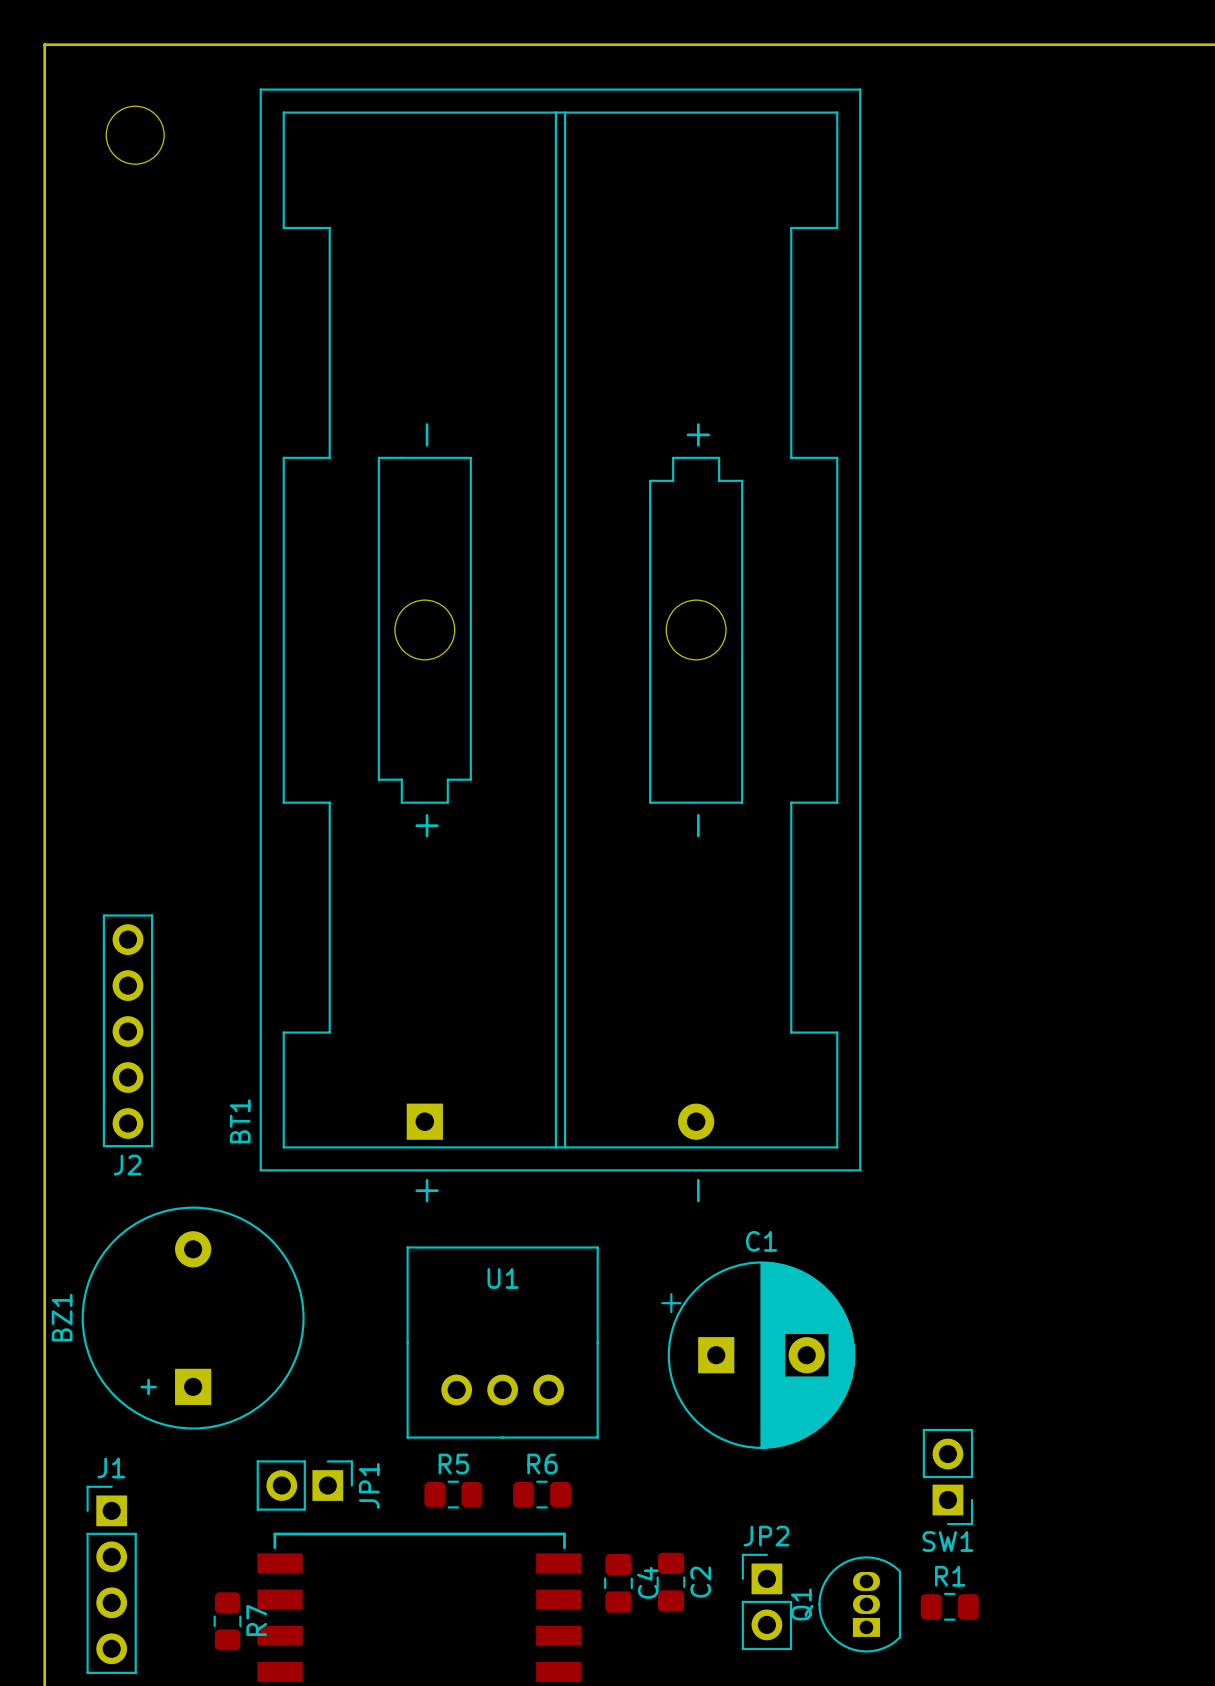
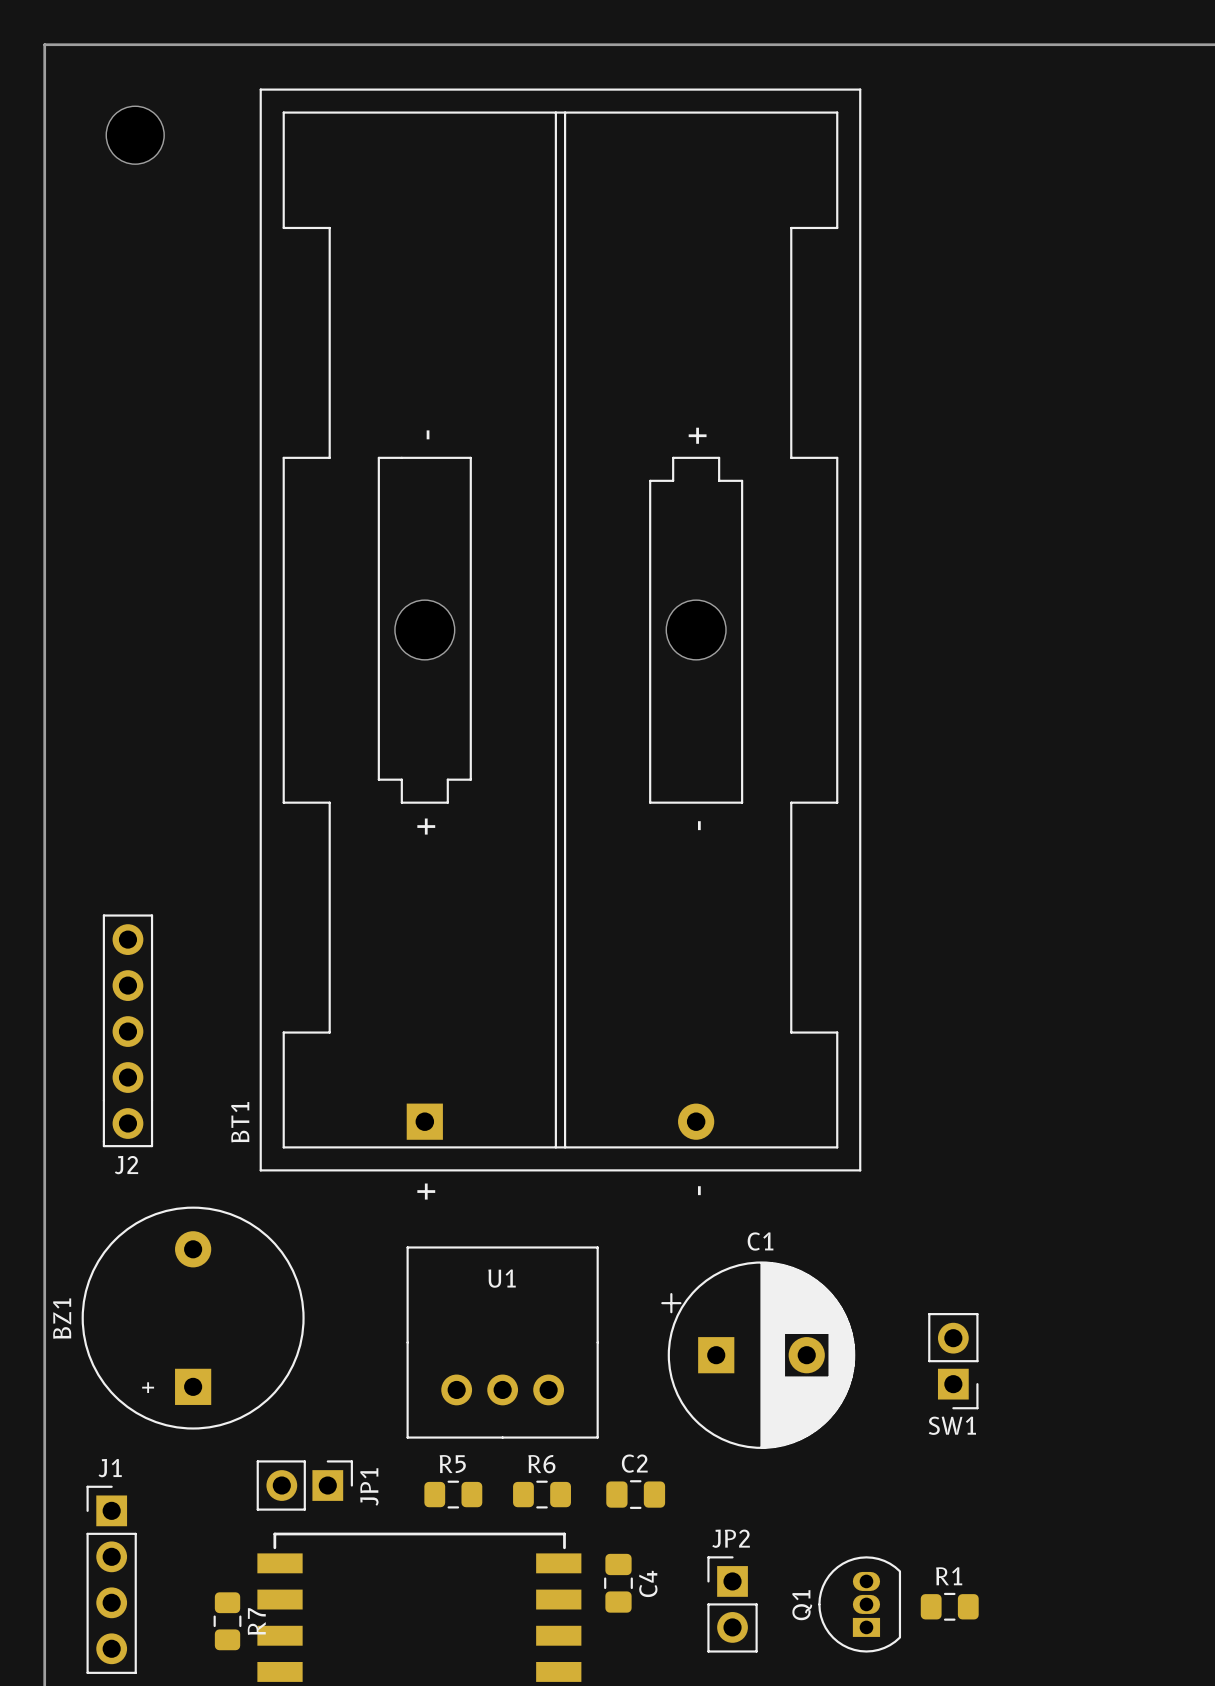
SW1 position: (947, 1477) -> (953, 1361)
C2 rotation: 0° (670, 1582) -> 90° clockwise (635, 1494)
C2 position: (670, 1582) -> (635, 1494)
C2 name position: C2 (700, 1582) -> C2 (634, 1463)
JP2 position: (766, 1601) -> (732, 1604)

